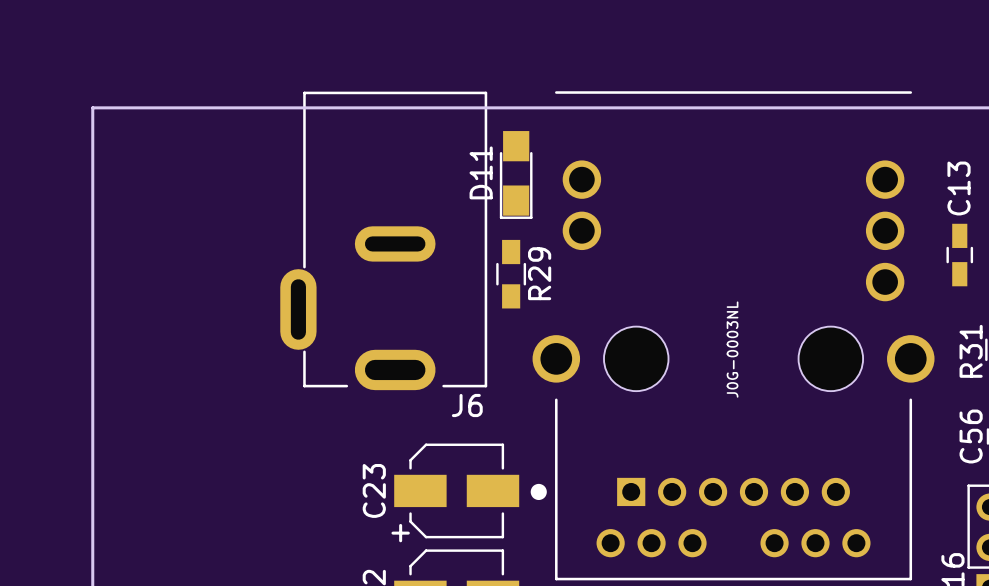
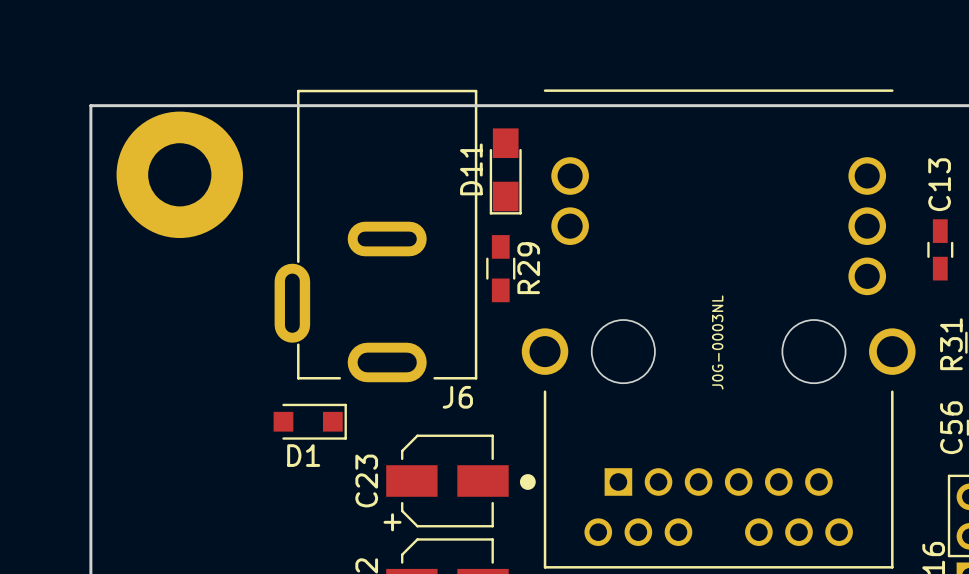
part: none -> (179, 174)
D1: none -> (310, 421)

